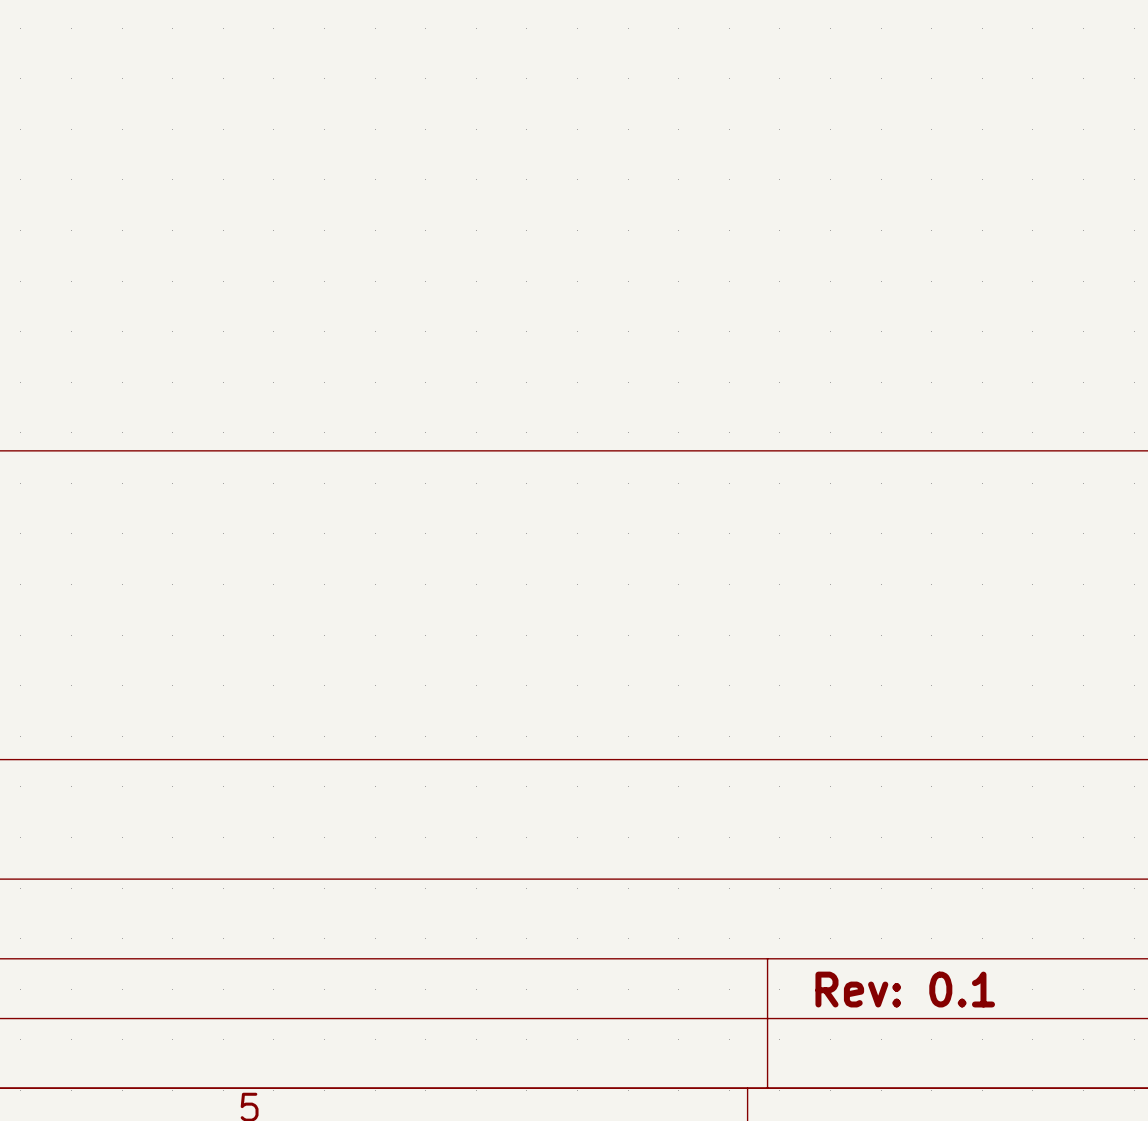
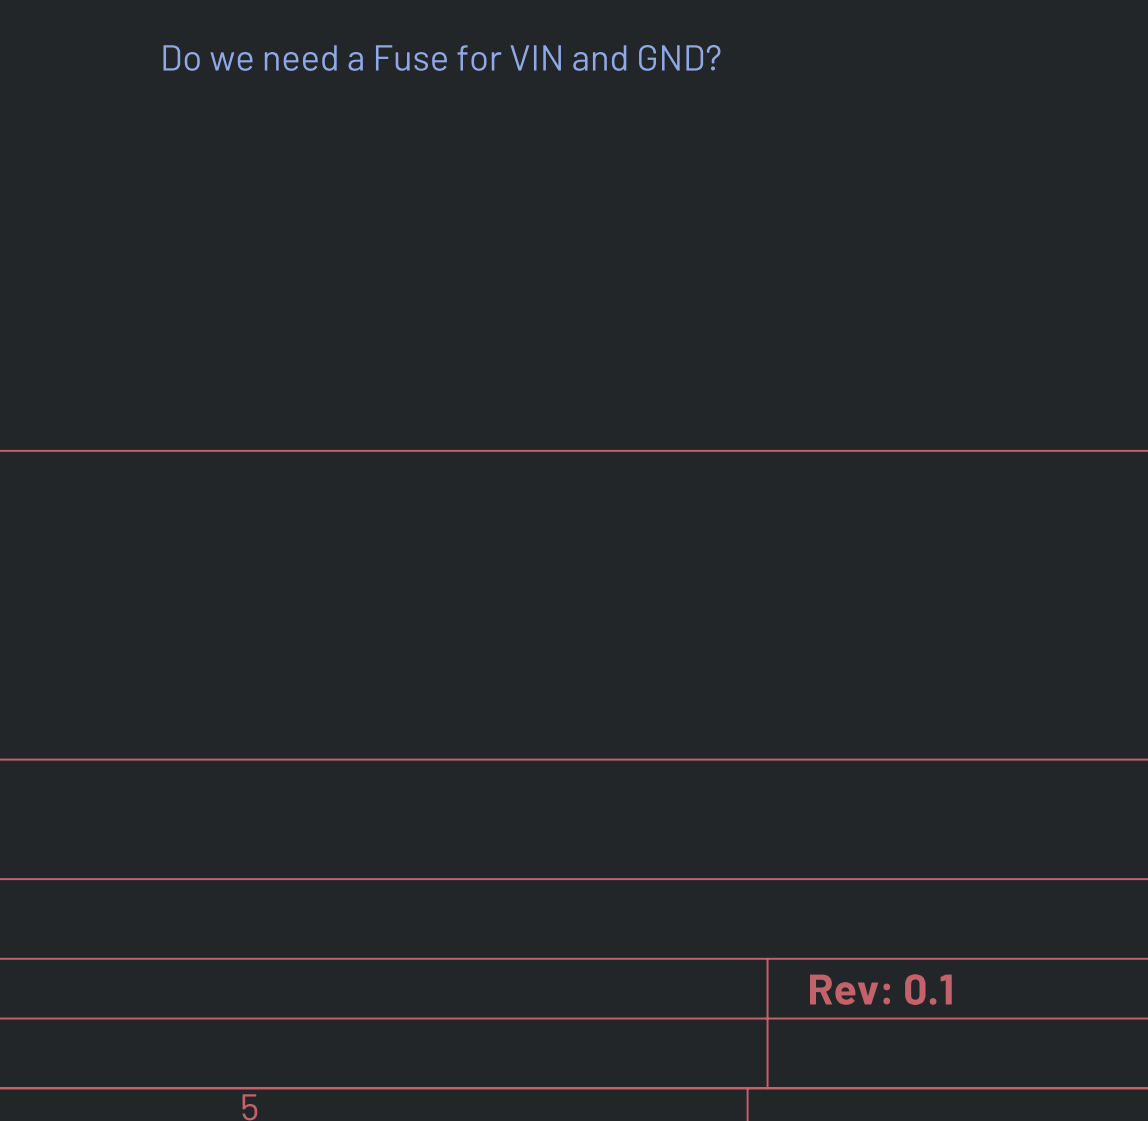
text: none -> Do we need a Fuse for VIN and GND? (441, 57)

